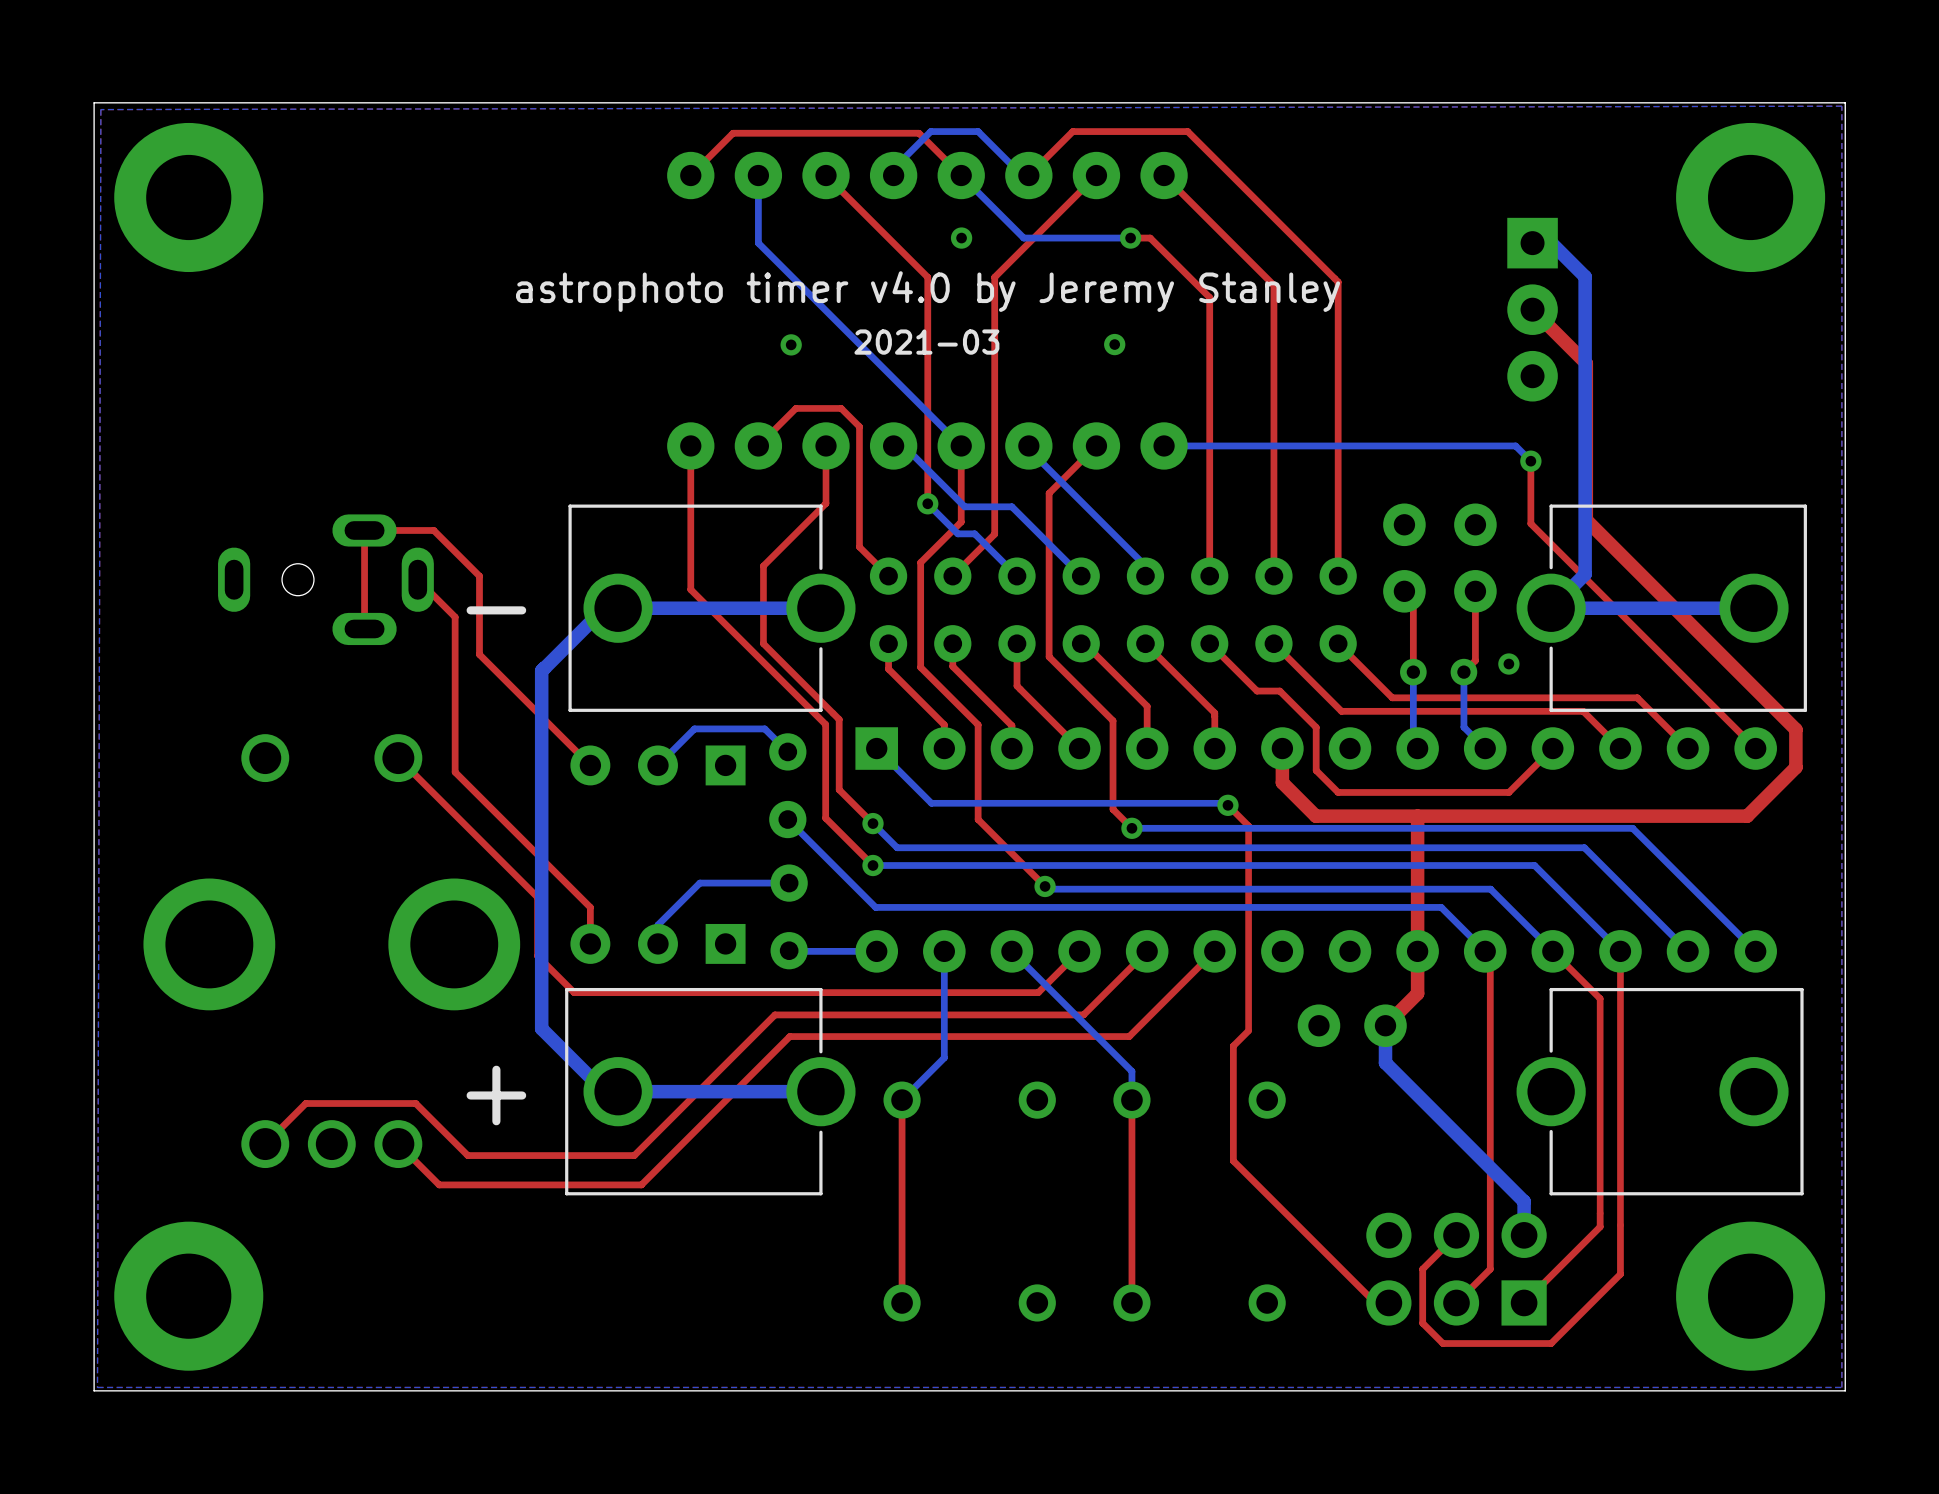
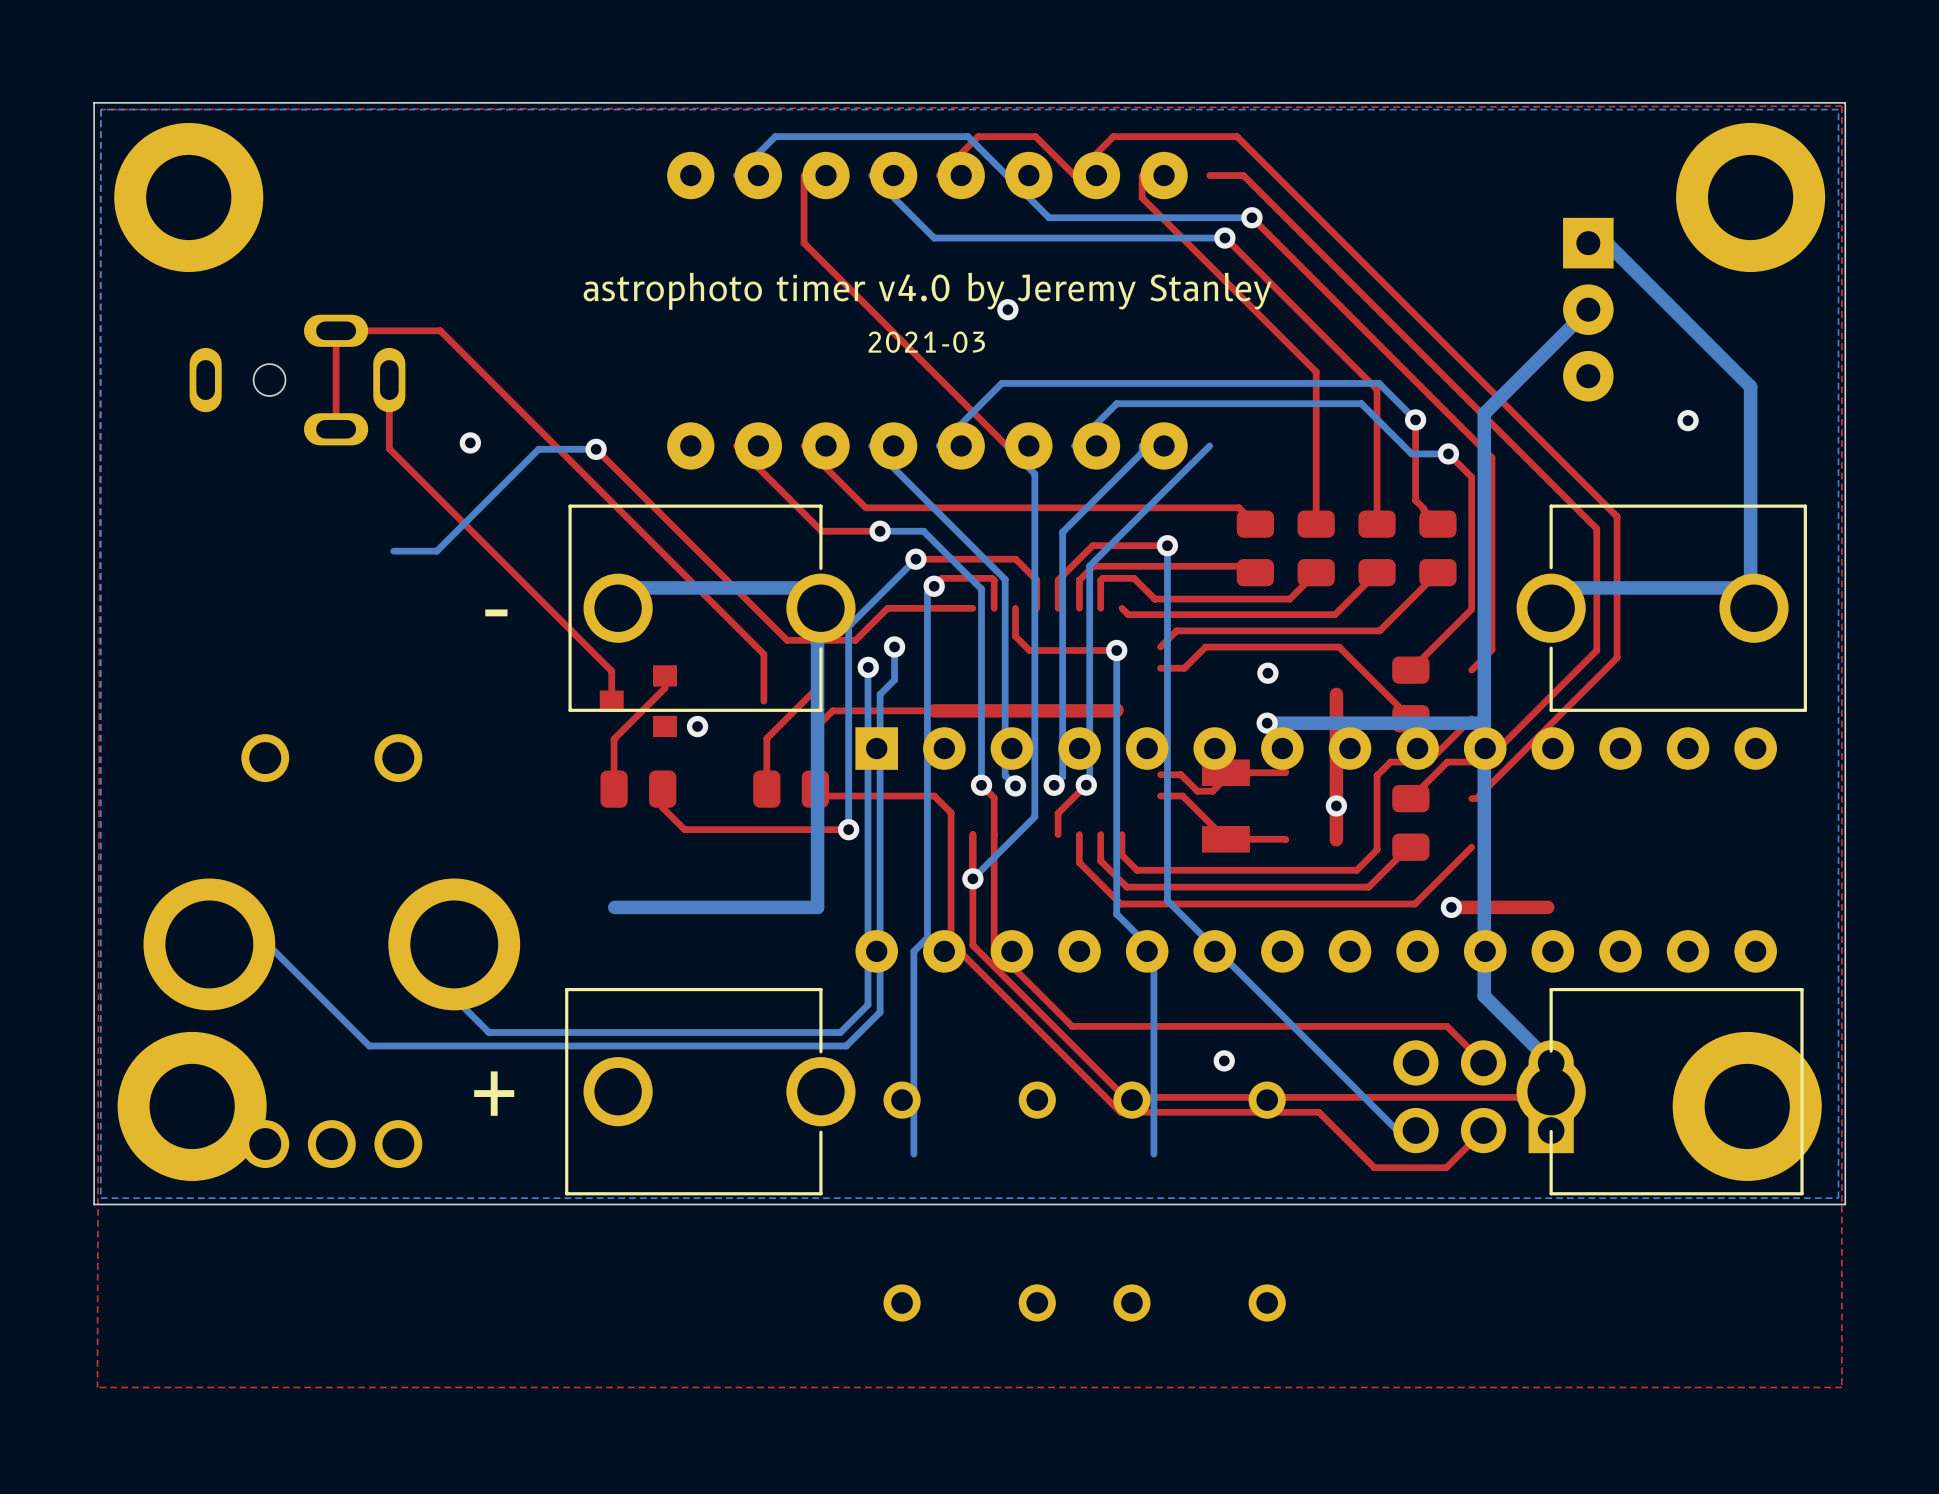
bottom zone outline: (1841, 106) (1841, 1387) (97, 1387) (100, 109) (1841, 106) -> (1838, 109) (1838, 1198) (100, 1198) (100, 109) (1838, 109)
bottom track: none -> (736, 175) (775, 136) (967, 136) (1049, 217) (1251, 217)
bottom track: (758, 175) (758, 243) (961, 445) -> none
top track: none -> (804, 175) (804, 243) (1006, 445)
top track: (826, 175) (927, 277) (927, 503) -> none
top track: none -> (939, 175) (978, 136) (1035, 136) (1074, 175) (1113, 136) (1237, 136) (1617, 516) (1617, 657) (1476, 798) (1471, 798)
top track: (961, 175) (918, 133) (733, 133) (690, 175) -> none
bottom track: (961, 175) (1023, 238) -> (871, 175) (934, 238) (1023, 238)
bottom track: (1022, 175) (978, 131) (930, 131) (886, 175) -> none
top track: (1028, 175) (1072, 131) (1187, 131) (1338, 282) (1338, 576) -> none
top track: (1096, 175) (994, 277) (994, 534) (952, 576) -> none
top track: none -> (1142, 175) (1142, 197) (1316, 371) (1316, 524)
top track: (1164, 175) (1273, 285) (1273, 576) -> none
top track: none -> (1209, 175) (1243, 175) (1596, 528) (1596, 650) (1485, 762) (1447, 762) (1410, 798)
top track: none -> (1251, 217) (1491, 457) (1491, 649) (1471, 670)
via: none -> (1251, 217)
via: (961, 238) -> none
top track: (1130, 238) (1150, 238) (1209, 297) (1209, 576) -> none
via: (1130, 238) -> none
top track: none -> (1224, 238) (1377, 389) (1377, 524)
bottom track: none -> (1224, 238) (1130, 238)
via: none -> (1224, 238)
bottom track: (1532, 243) (1551, 243) (1585, 276) (1585, 574) (1551, 608) (1753, 608) -> none
bottom track: none -> (1588, 243) (1606, 243) (1750, 386) (1750, 587) (1547, 587)
via: none -> (1007, 309)
top track: (1532, 309) (1586, 363) (1586, 520) (1795, 729) (1795, 767) (1747, 816) (1315, 816) (1282, 782) (1282, 748) -> none
part position: (1532, 309) -> (1588, 309)
bottom track: none -> (1588, 309) (1484, 413) (1484, 996) (1551, 1062)
via: (791, 344) -> none
via: (1114, 344) -> none
top track: none -> (389, 380) (389, 448) (611, 671) (611, 701)
top track: none -> (1415, 419) (1415, 500) (1437, 524)
bottom track: none -> (1415, 419) (1379, 383) (1001, 383) (939, 445)
via: none -> (1415, 419)
via: none -> (1688, 420)
top track: none -> (336, 429) (336, 330) (440, 330) (763, 654) (763, 701)
via: none -> (470, 442)
top track: (690, 445) (690, 589) (825, 724) (825, 818) (872, 865) -> none
top track: none -> (736, 445) (821, 531) (880, 531)
top track: (758, 445) (795, 408) (841, 408) (859, 426) (859, 547) (888, 576) -> none
top track: none -> (804, 445) (865, 507) (1239, 507) (1255, 524)
top track: (826, 445) (826, 503) (763, 565) (763, 643) (839, 719) (839, 789) (872, 823) -> none
bottom track: none -> (871, 445) (1005, 579) (1005, 775) (1015, 785)
bottom track: (893, 445) (903, 445) (964, 506) (1011, 506) (1081, 576) -> none
top track: (961, 445) (961, 522) (920, 562) (920, 667) (978, 724) (978, 819) (1045, 886) -> none
bottom track: none -> (1006, 445) (1034, 473) (1034, 816) (972, 878)
bottom track: (1028, 445) (1028, 449) (1145, 565) (1145, 576) -> none
bottom track: none -> (1074, 445) (1116, 403) (1361, 403) (1411, 453) (1448, 453)
top track: (1096, 445) (1049, 493) (1049, 656) (1113, 720) (1113, 809) (1131, 828) -> none
bottom track: none -> (1142, 445) (1142, 452) (1062, 532) (1062, 776) (1054, 785)
bottom track: (1164, 445) (1515, 445) (1530, 461) -> none
bottom track: none -> (1209, 445) (1089, 565) (1089, 781) (1086, 785)
top track: none -> (596, 449) (787, 640) (855, 640) (887, 608) (972, 608)
bottom track: none -> (596, 449) (538, 449) (436, 551) (393, 551)
via: none -> (596, 449)
top track: none -> (1448, 453) (1471, 477) (1471, 609) (1410, 670)
via: none -> (1448, 453)
top track: (1530, 461) (1530, 523) (1755, 748) -> none
via: (1530, 461) -> none
bottom track: (927, 503) (957, 533) (974, 533) (1017, 576) -> none
via: (927, 503) -> none
bottom track: none -> (880, 531) (923, 531) (981, 589) (981, 785)
via: none -> (880, 531)
top track: none -> (1167, 545) (1092, 545) (1058, 580) (1058, 608)
bottom track: none -> (1167, 545) (1167, 900) (1397, 1130) (1415, 1130)
via: none -> (1167, 545)
part: none -> (1255, 548)
part: none -> (1316, 548)
part: none -> (1377, 548)
part: none -> (1437, 548)
part: (1404, 558) -> none
part: (1475, 558) -> none
top track: none -> (915, 559) (1015, 559) (1036, 580) (1036, 608)
bottom track: none -> (915, 559) (848, 626) (848, 829)
via: none -> (915, 559)
top track: none -> (1255, 572) (1248, 566) (1093, 566) (1079, 580) (1079, 608)
top track: none -> (1316, 572) (1289, 599) (1154, 599) (1134, 578) (1102, 578) (1100, 580) (1100, 608)
top track: none -> (1377, 572) (1335, 614) (1128, 614) (1121, 608)
top track: none -> (1437, 572) (1379, 630) (1176, 630) (1160, 646)
part position: (325, 579) -> (297, 380)
top track: (417, 579) (455, 617) (455, 772) (590, 907) (590, 943) -> none
top track: none -> (934, 586) (942, 578) (992, 578) (994, 580) (994, 608)
bottom track: none -> (934, 586) (927, 593) (927, 937) (913, 951) (913, 1154)
via: none -> (934, 586)
bottom track: none -> (614, 587) (817, 587) (817, 907) (614, 907)
top track: (1404, 597) (1413, 606) (1413, 672) -> none
top track: (1475, 597) (1475, 660) (1463, 672) -> none
bottom track: (807, 608) (604, 608) (544, 668) -> none
top track: none -> (1015, 608) (1015, 636) (1029, 650) (1116, 650)
part: (888, 609) -> none
part: (952, 609) -> none
part: (1017, 609) -> none
part: (1081, 609) -> none
part: (1145, 609) -> none
part: (1209, 609) -> none
part: (1273, 609) -> none
part: (1338, 609) -> none
top track: (364, 628) (364, 530) (433, 530) (479, 576) (479, 654) (590, 765) -> none
top track: (888, 643) (888, 669) (944, 724) (944, 748) -> none
top track: (952, 643) (952, 666) (1011, 725) (1011, 748) -> none
top track: (1017, 643) (1017, 685) (1079, 748) -> none
top track: (1084, 643) (1147, 706) (1147, 748) -> none
top track: (1145, 643) (1214, 713) (1214, 748) -> none
top track: (1209, 643) (1257, 691) (1279, 691) (1316, 727) (1316, 770) (1338, 792) (1508, 792) (1552, 748) -> none
top track: (1273, 643) (1341, 711) (1583, 711) (1620, 748) -> none
top track: (1338, 643) (1392, 697) (1637, 697) (1688, 748) -> none
bottom track: none -> (894, 646) (894, 679) (880, 694) (880, 1012) (846, 1046) (369, 1046) (260, 937)
via: none -> (894, 646)
bottom track: none -> (1116, 650) (1116, 914) (1153, 951) (1153, 1154)
via: none -> (1116, 650)
via: (1508, 664) -> none
bottom track: none -> (868, 667) (868, 1004) (840, 1032) (488, 1032) (393, 937)
via: none -> (868, 667)
bottom track: (544, 668) (541, 670) (541, 1028) (604, 1091) (807, 1091) -> none
top track: none -> (1160, 668) (1184, 668) (1205, 647) (1339, 647) (1410, 718)
bottom track: (1413, 672) (1413, 744) (1417, 748) -> none
part: (1438, 672) -> none
bottom track: (1463, 672) (1463, 727) (1485, 748) -> none
via: none -> (1267, 673)
top track: none -> (665, 675) (665, 688) (614, 739) (614, 789)
top track: none -> (817, 675) (817, 688) (766, 738) (766, 789)
top track: none -> (1336, 694) (1336, 839)
part: none -> (1410, 694)
part: none -> (638, 701)
top track: none -> (1117, 710) (832, 710) (817, 726)
top track: none -> (1471, 718) (1428, 762) (1390, 762) (1377, 775) (1377, 849) (1356, 870) (1137, 870) (1121, 855) (1121, 834)
bottom track: none -> (1267, 723) (1480, 723) (1484, 727)
via: none -> (1267, 723)
via: none -> (697, 726)
part footprint: [769, 733, 807, 839] -> [753, 770, 830, 808]
bottom track: (876, 748) (931, 803) (1225, 803) (1227, 805) -> none
bottom track: (787, 751) (764, 728) (694, 728) (657, 765) -> none
top track: (398, 758) (537, 897) (537, 956) (574, 992) (1038, 992) (1079, 951) -> none
part: (657, 765) -> none
top track: none -> (1285, 772) (1225, 772) (1225, 777) (1212, 791) (1197, 791) (1180, 774) (1160, 774)
top track: none -> (981, 785) (994, 797) (994, 948) (1072, 1026) (1447, 1026) (1483, 1062)
via: none -> (981, 785)
via: none -> (1015, 785)
via: none -> (1054, 785)
top track: none -> (1086, 785) (1058, 813) (1058, 834)
via: none -> (1086, 785)
part: none -> (638, 789)
top track: none -> (662, 789) (662, 807) (684, 829) (848, 829)
top track: none -> (815, 789) (822, 796) (934, 796) (951, 812) (951, 942) (1120, 1112) (1318, 1112) (1374, 1167) (1446, 1167) (1483, 1130)
top track: none -> (1160, 796) (1182, 796) (1225, 839) (1285, 839)
top track: (1227, 805) (1248, 825) (1248, 1030) (1233, 1046) (1233, 1160) (1375, 1302) (1388, 1302) -> none
via: (1227, 805) -> none
via: none -> (1336, 805)
part: none -> (1225, 806)
top track: (1417, 816) (1417, 993) (1385, 1025) -> none
bottom track: (787, 819) (875, 907) (1441, 907) (1485, 951) -> none
part: none -> (1410, 822)
bottom track: (872, 823) (897, 847) (1584, 847) (1688, 951) -> none
via: (872, 823) -> none
bottom track: (1131, 828) (1632, 828) (1755, 951) -> none
via: (1131, 828) -> none
via: none -> (848, 829)
top track: none -> (972, 834) (972, 945) (1124, 1097) (1518, 1097) (1551, 1130)
top track: none -> (1079, 834) (1079, 862) (1120, 904) (1414, 904) (1471, 847)
top track: none -> (1100, 834) (1100, 860) (1126, 887) (1368, 887) (1410, 847)
bottom track: (872, 865) (1534, 865) (1620, 951) -> none
via: (872, 865) -> none
via: none -> (972, 878)
bottom track: (789, 883) (699, 883) (657, 925) (657, 943) -> none
bottom track: (1045, 886) (1047, 889) (1490, 889) (1552, 951) -> none
via: (1045, 886) -> none
via: none -> (1451, 907)
top track: none -> (1547, 907) (1451, 907)
part: (789, 916) -> none
part: (657, 943) -> none
bottom track: (789, 950) (876, 951) -> none
bottom track: (944, 951) (944, 1057) (902, 1100) -> none
bottom track: (1011, 951) (1131, 1071) (1131, 1100) -> none
top track: (1147, 951) (1083, 1014) (774, 1014) (634, 1155) (467, 1155) (415, 1103) (305, 1103) (265, 1144) -> none
top track: (1214, 951) (1129, 1036) (789, 1036) (641, 1184) (439, 1184) (398, 1144) -> none
top track: (1485, 951) (1490, 956) (1490, 1269) (1456, 1302) -> none
top track: (1552, 951) (1600, 998) (1600, 1226) (1524, 1302) -> none
top track: (1620, 951) (1620, 1274) (1551, 1343) (1442, 1343) (1422, 1323) (1422, 1269) (1456, 1235) -> none
part: (1352, 1025) -> none
bottom track: (1385, 1025) (1385, 1062) (1524, 1201) (1524, 1235) -> none
via: none -> (1224, 1060)
top track: (902, 1100) (902, 1302) -> none
top track: (1131, 1100) (1131, 1302) -> none
board edge: (1845, 1204) (1845, 1390) (94, 1390) (94, 1204) -> (1845, 1204) (94, 1204)
part position: (1456, 1269) -> (1483, 1096)
part position: (188, 1296) -> (192, 1106)
part position: (1750, 1296) -> (1747, 1106)

